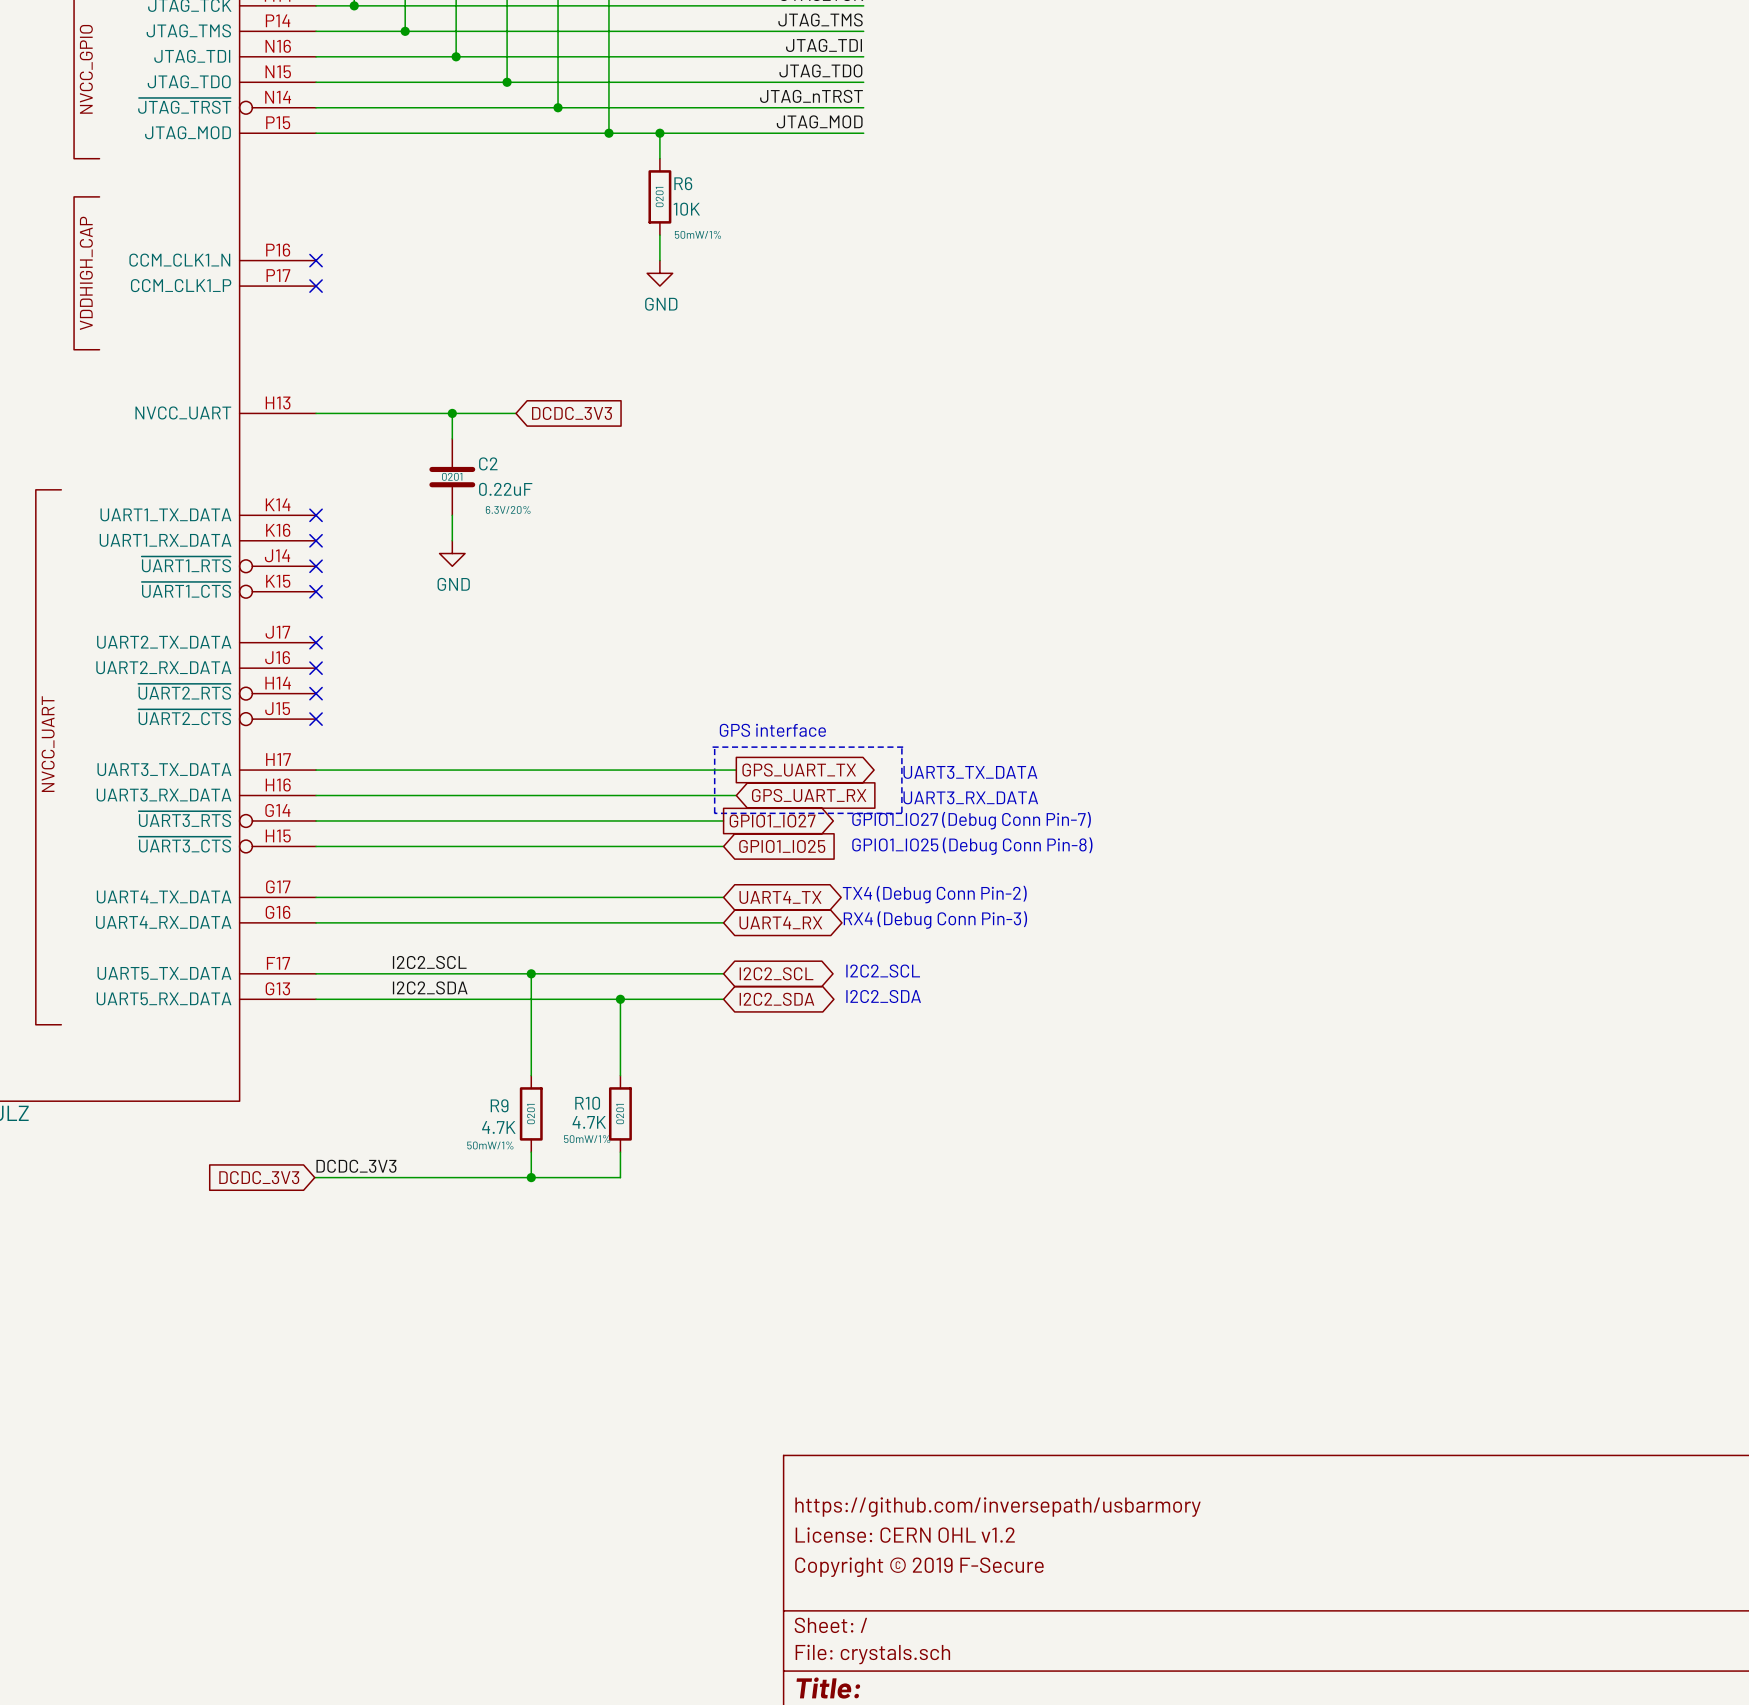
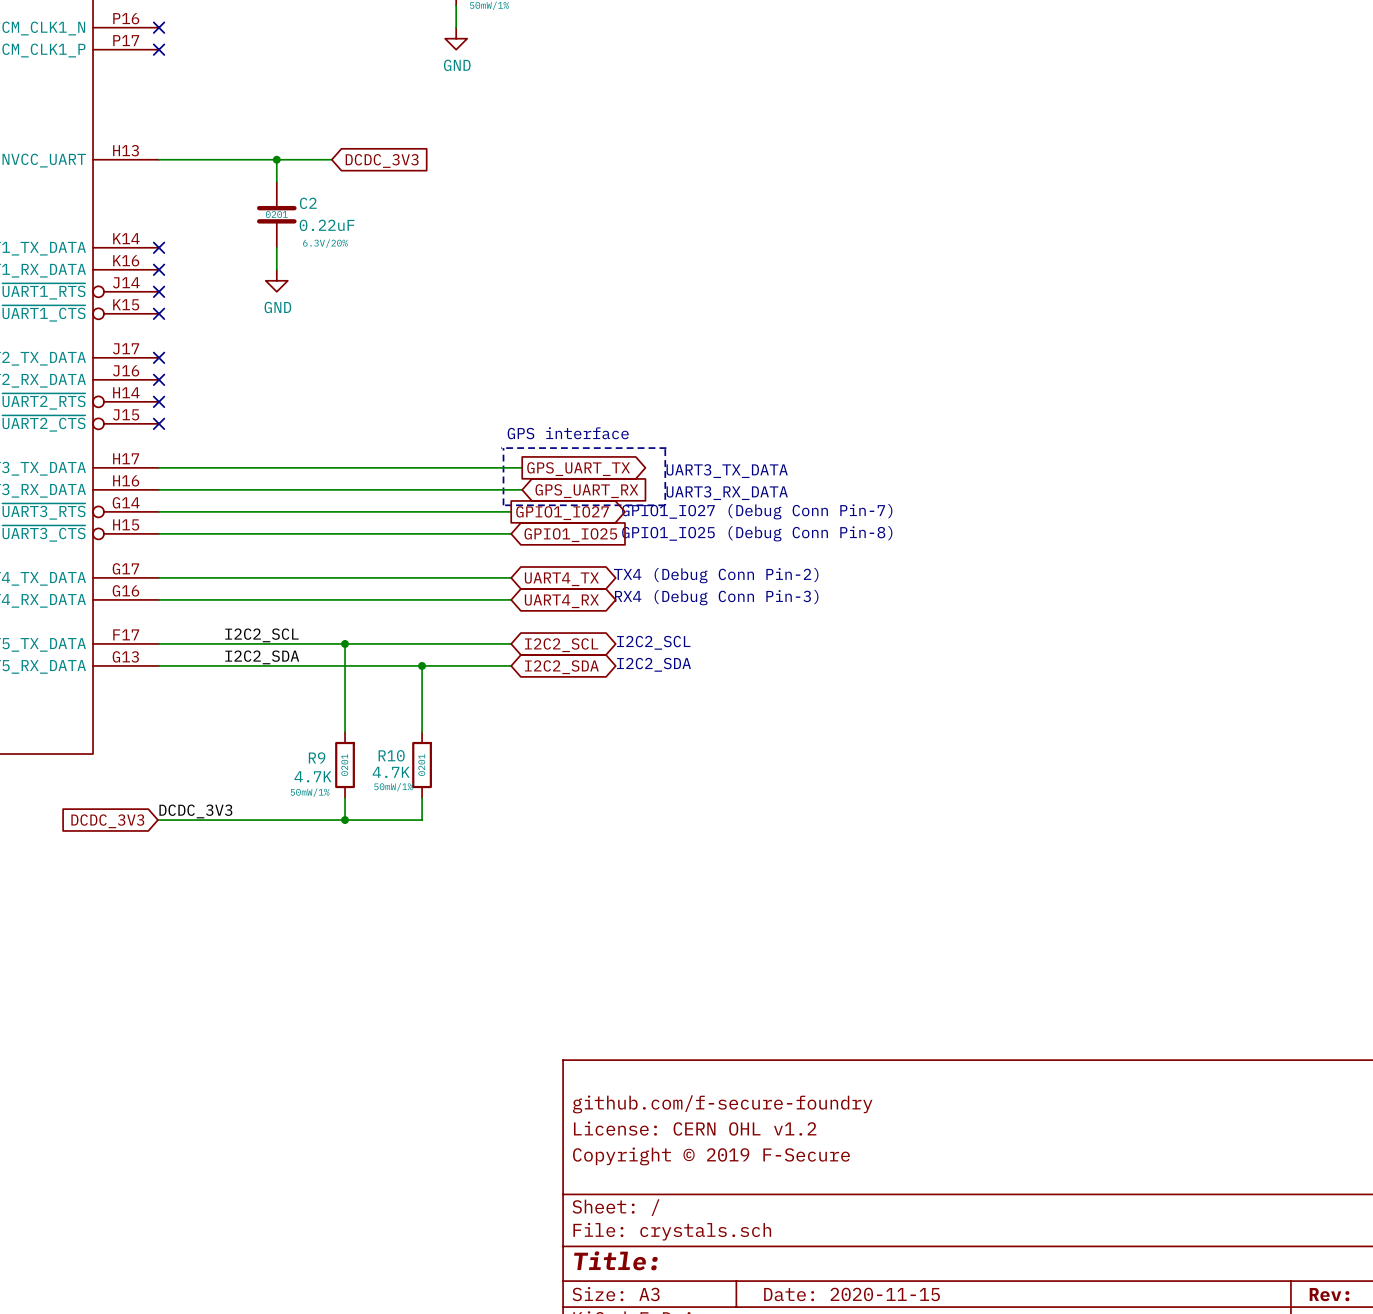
title block: https://github.com/inversepath/usbarmory (998, 1507) -> github.com/f-secure-foundry (722, 1104)

